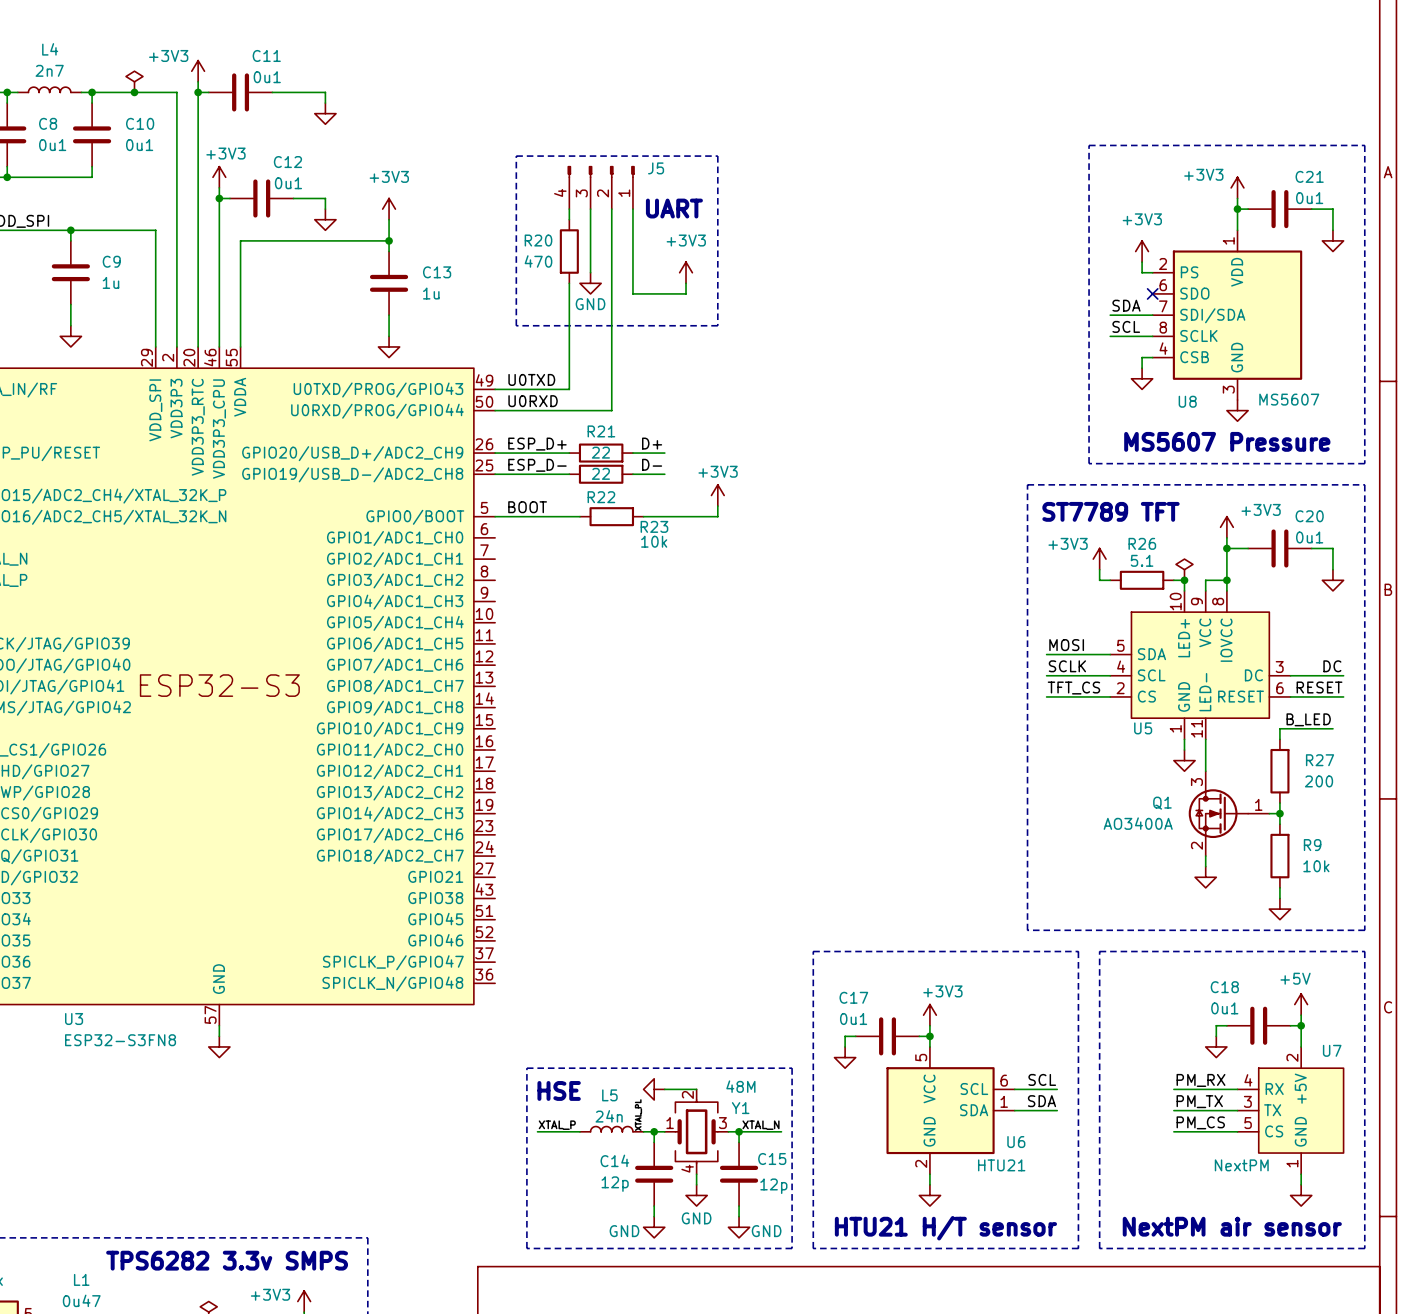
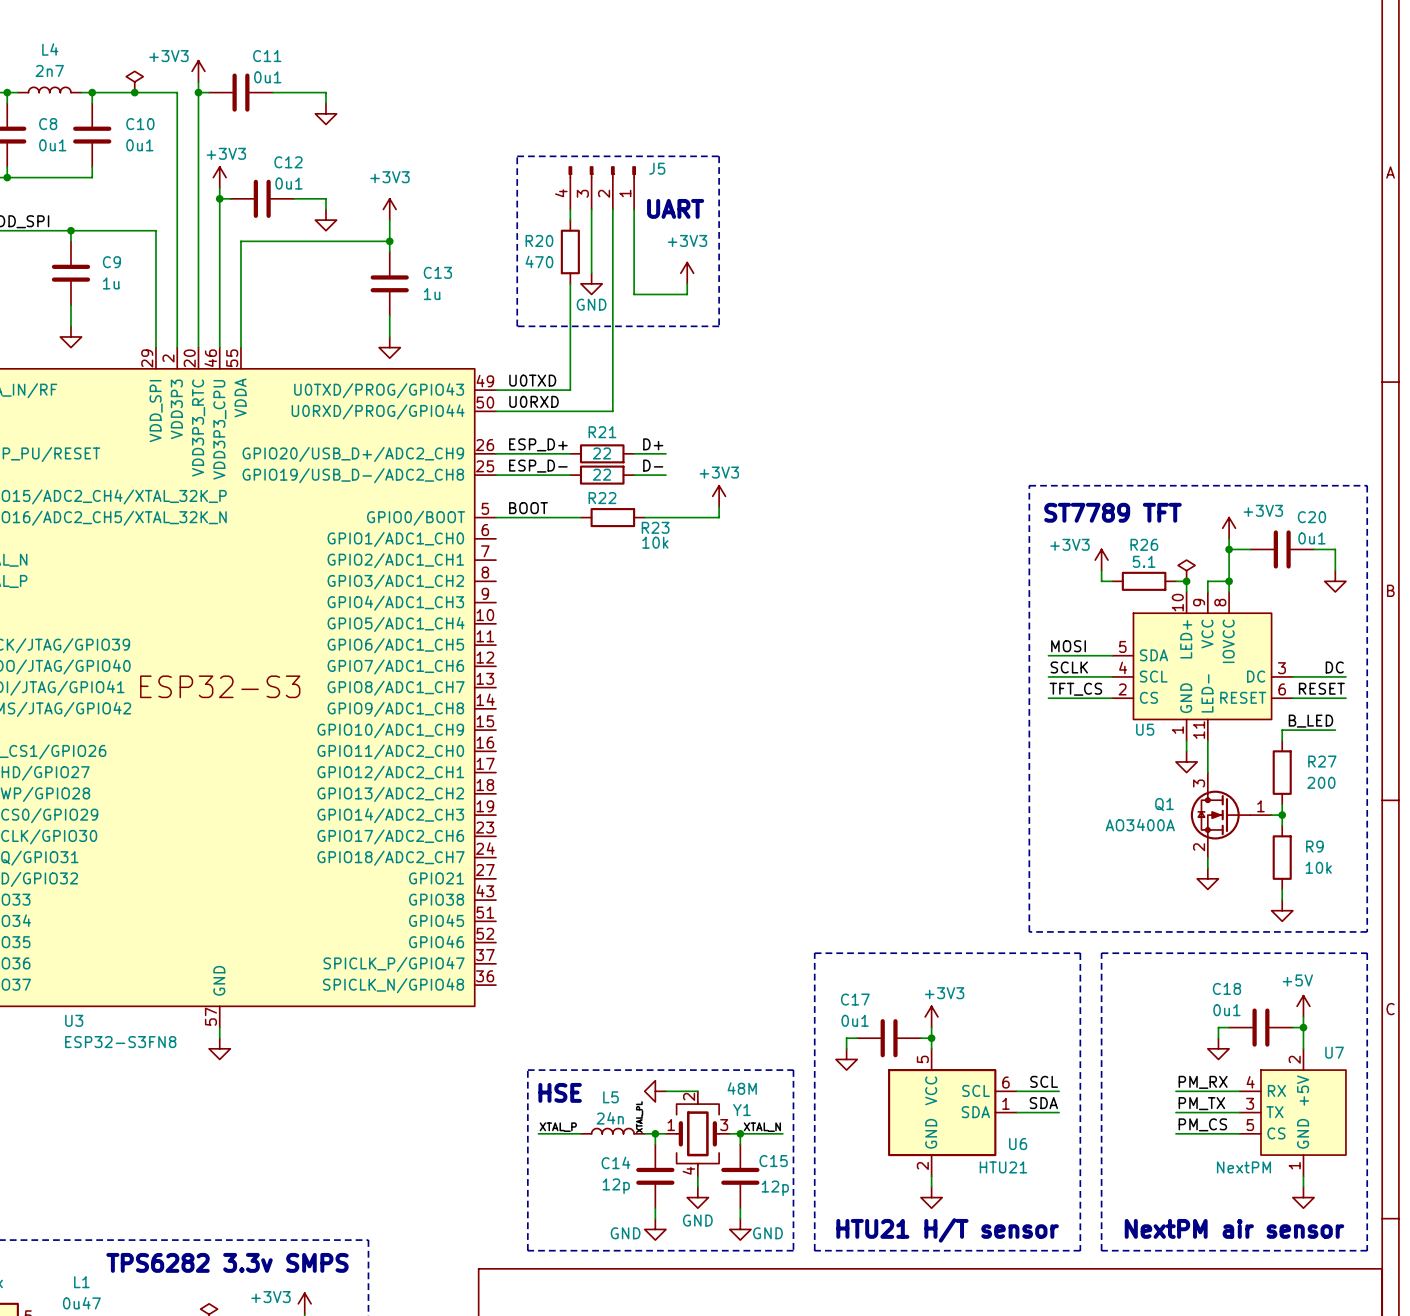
line: (1089, 145) (1364, 145) (1364, 463) (1089, 463) (1089, 145) -> none
power symbol: +3V3 (1237, 187) -> none
wire: (1237, 198) (1237, 230) -> none
wire: (1237, 209) (1248, 209) -> none
junction: (1237, 209) -> none
C21: 0u1 (1279, 209) -> none
wire: (1311, 209) (1332, 209) (1332, 230) -> none
power symbol: (1332, 240) -> none
power symbol: +3V3 (1142, 251) -> none
wire: (1142, 262) (1142, 272) (1152, 272) -> none
no-connect mark: (1152, 293) -> none
label: SDA (1126, 305) -> none
wire: (1110, 315) (1152, 315) -> none
U8: MS5607 (1227, 315) -> none
label: SCL (1126, 326) -> none
wire: (1110, 336) (1152, 336) -> none
wire: (1152, 357) (1142, 357) (1142, 368) -> none
power symbol: (1142, 378) -> none
power symbol: (1237, 410) -> none
text: MS5607 Pressure (1227, 441) -> none

